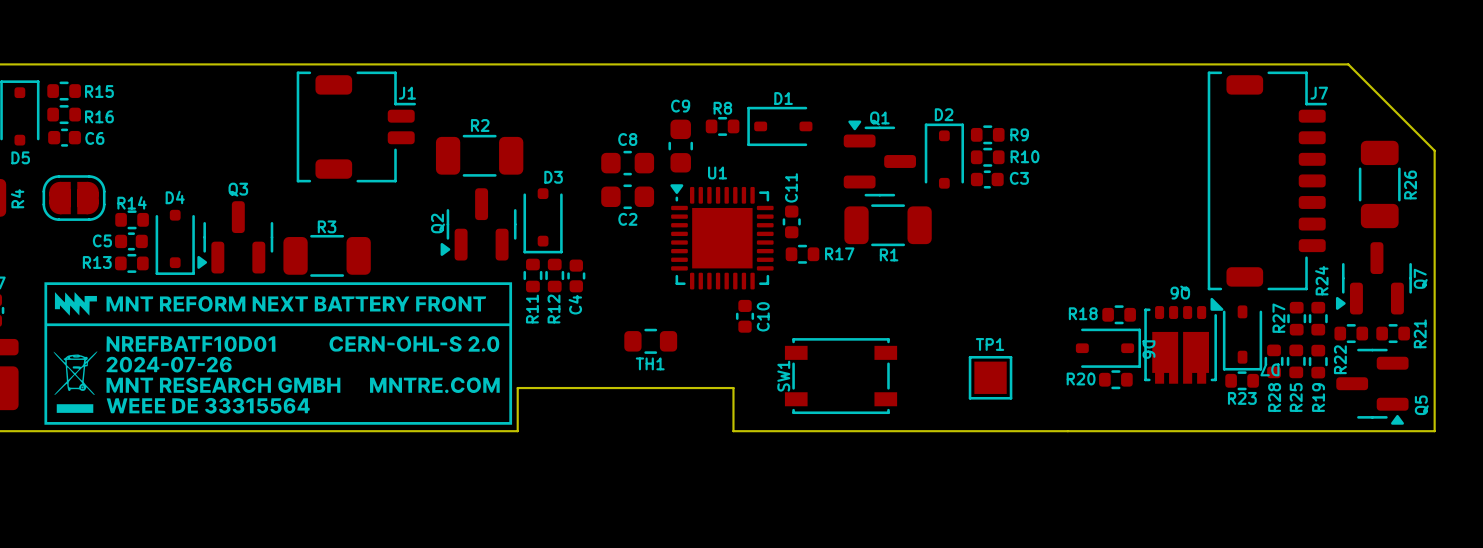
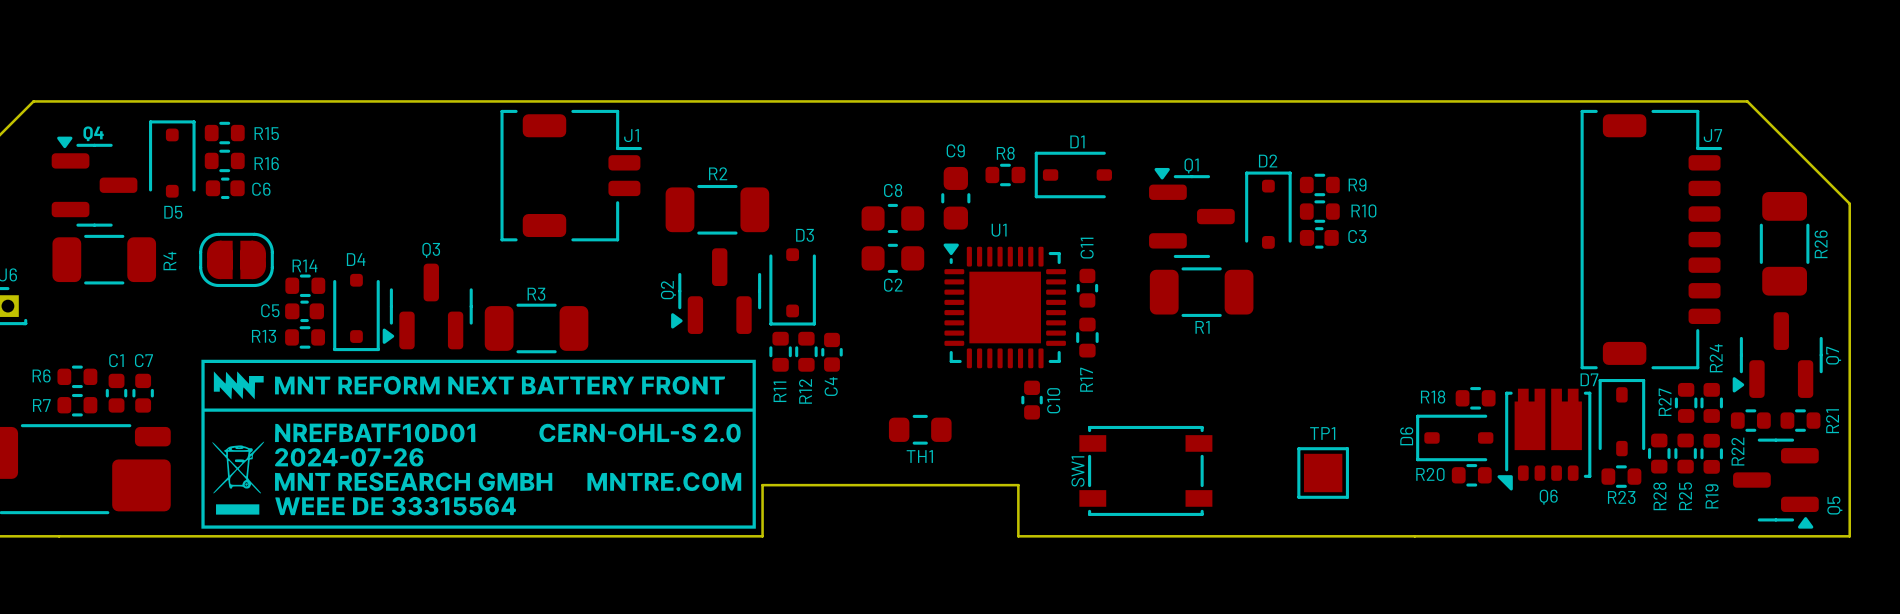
R17 rotation: 0° (802, 254) -> 90° clockwise (1087, 337)
D7 rotation: 0° (1242, 337) -> 180° (1621, 417)
Q6 rotation: 0° (1183, 340) -> 180° (1544, 439)
D6 rotation: 0° (1108, 348) -> 180° (1454, 437)

